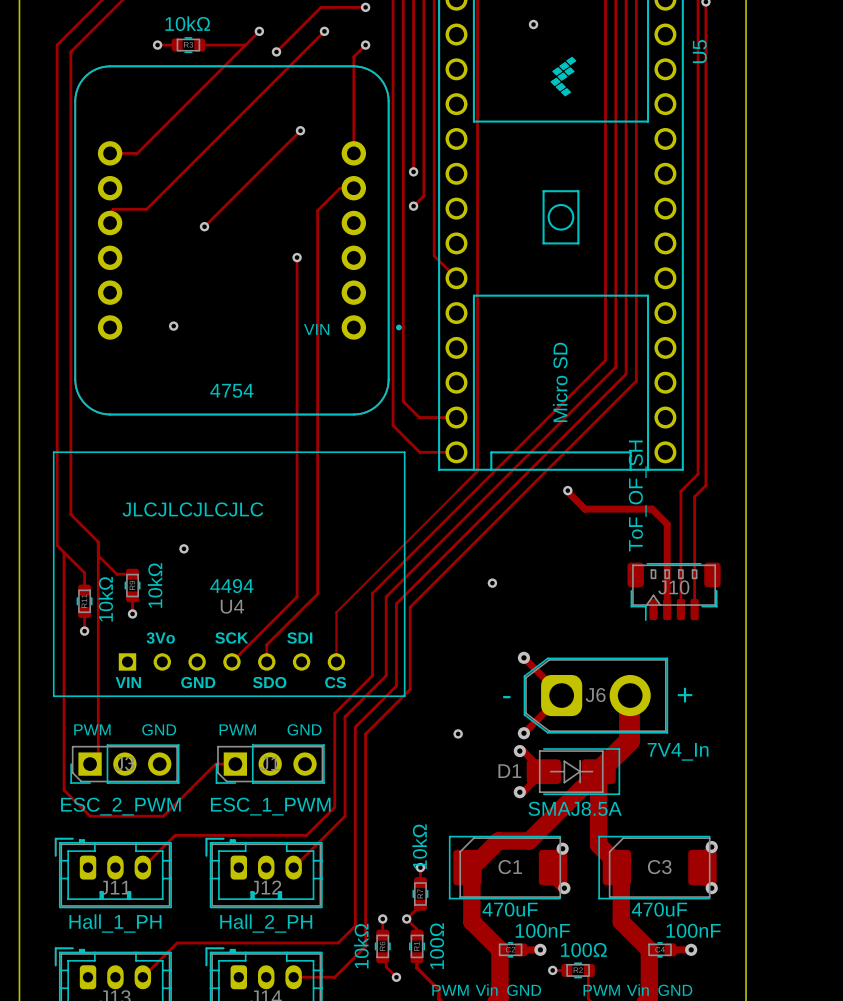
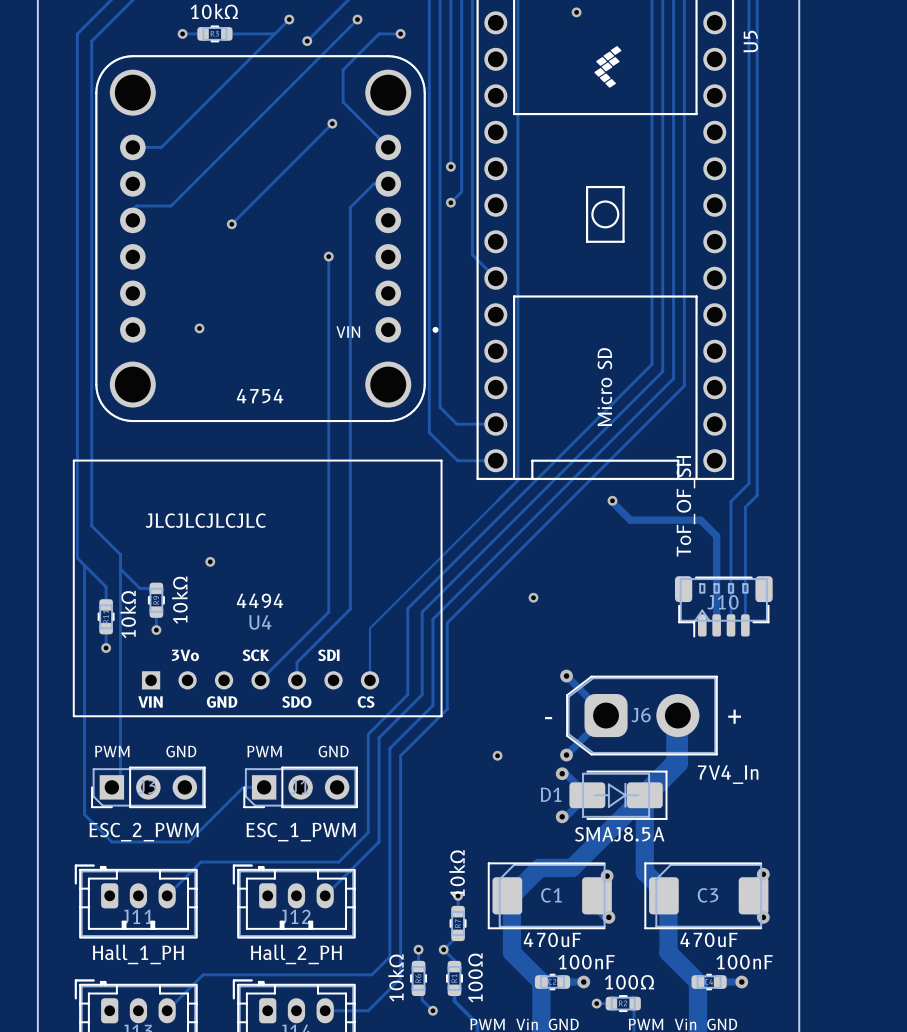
track: (365, 45) (353, 56) (353, 153) -> (400, 33) (379, 33) (343, 69) (343, 102) (388, 147)
part footprint: [74, 65, 402, 416] -> [95, 55, 439, 422]

